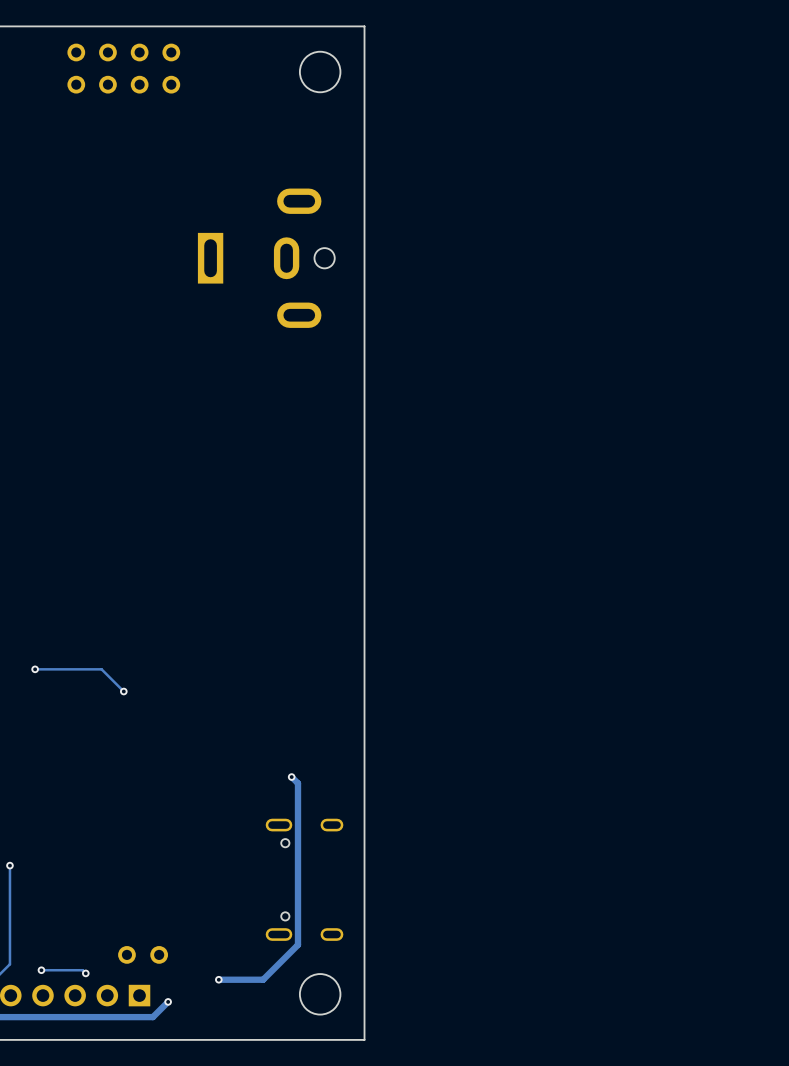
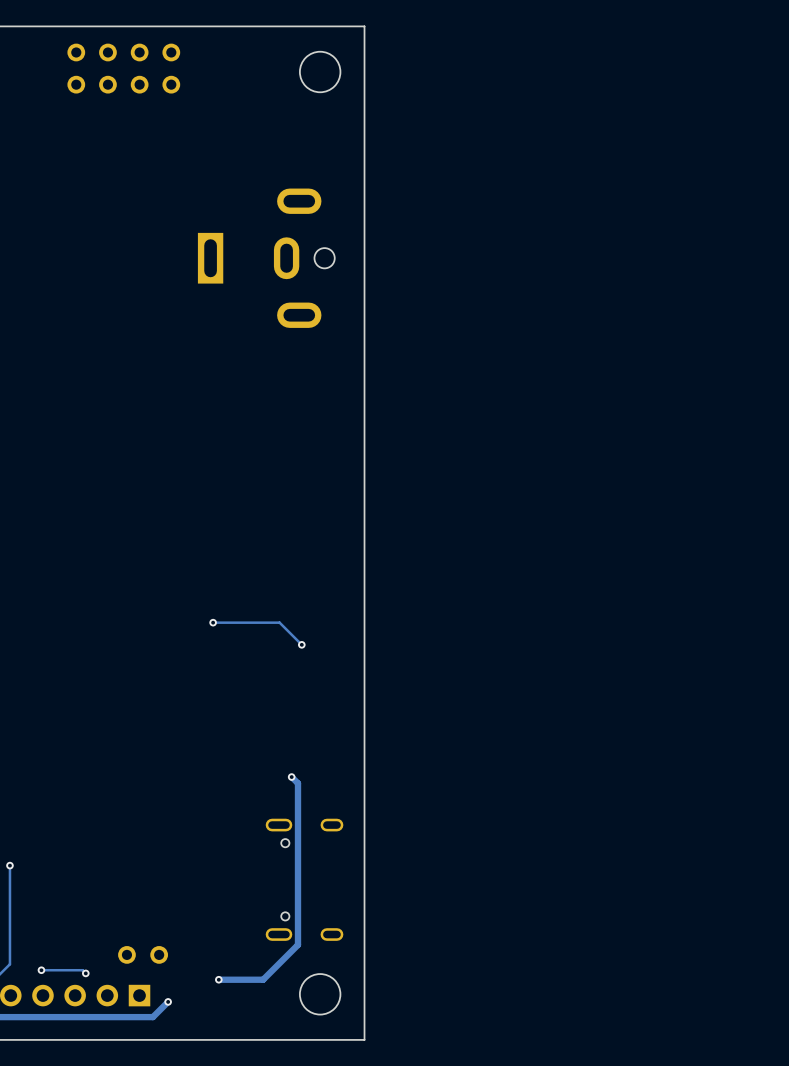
via: none -> (213, 622)
via: none -> (301, 644)
track: (35, 669) (101, 669) (123, 691) -> (213, 622) (279, 622) (301, 644)
via: (35, 669) -> none
via: (123, 691) -> none

